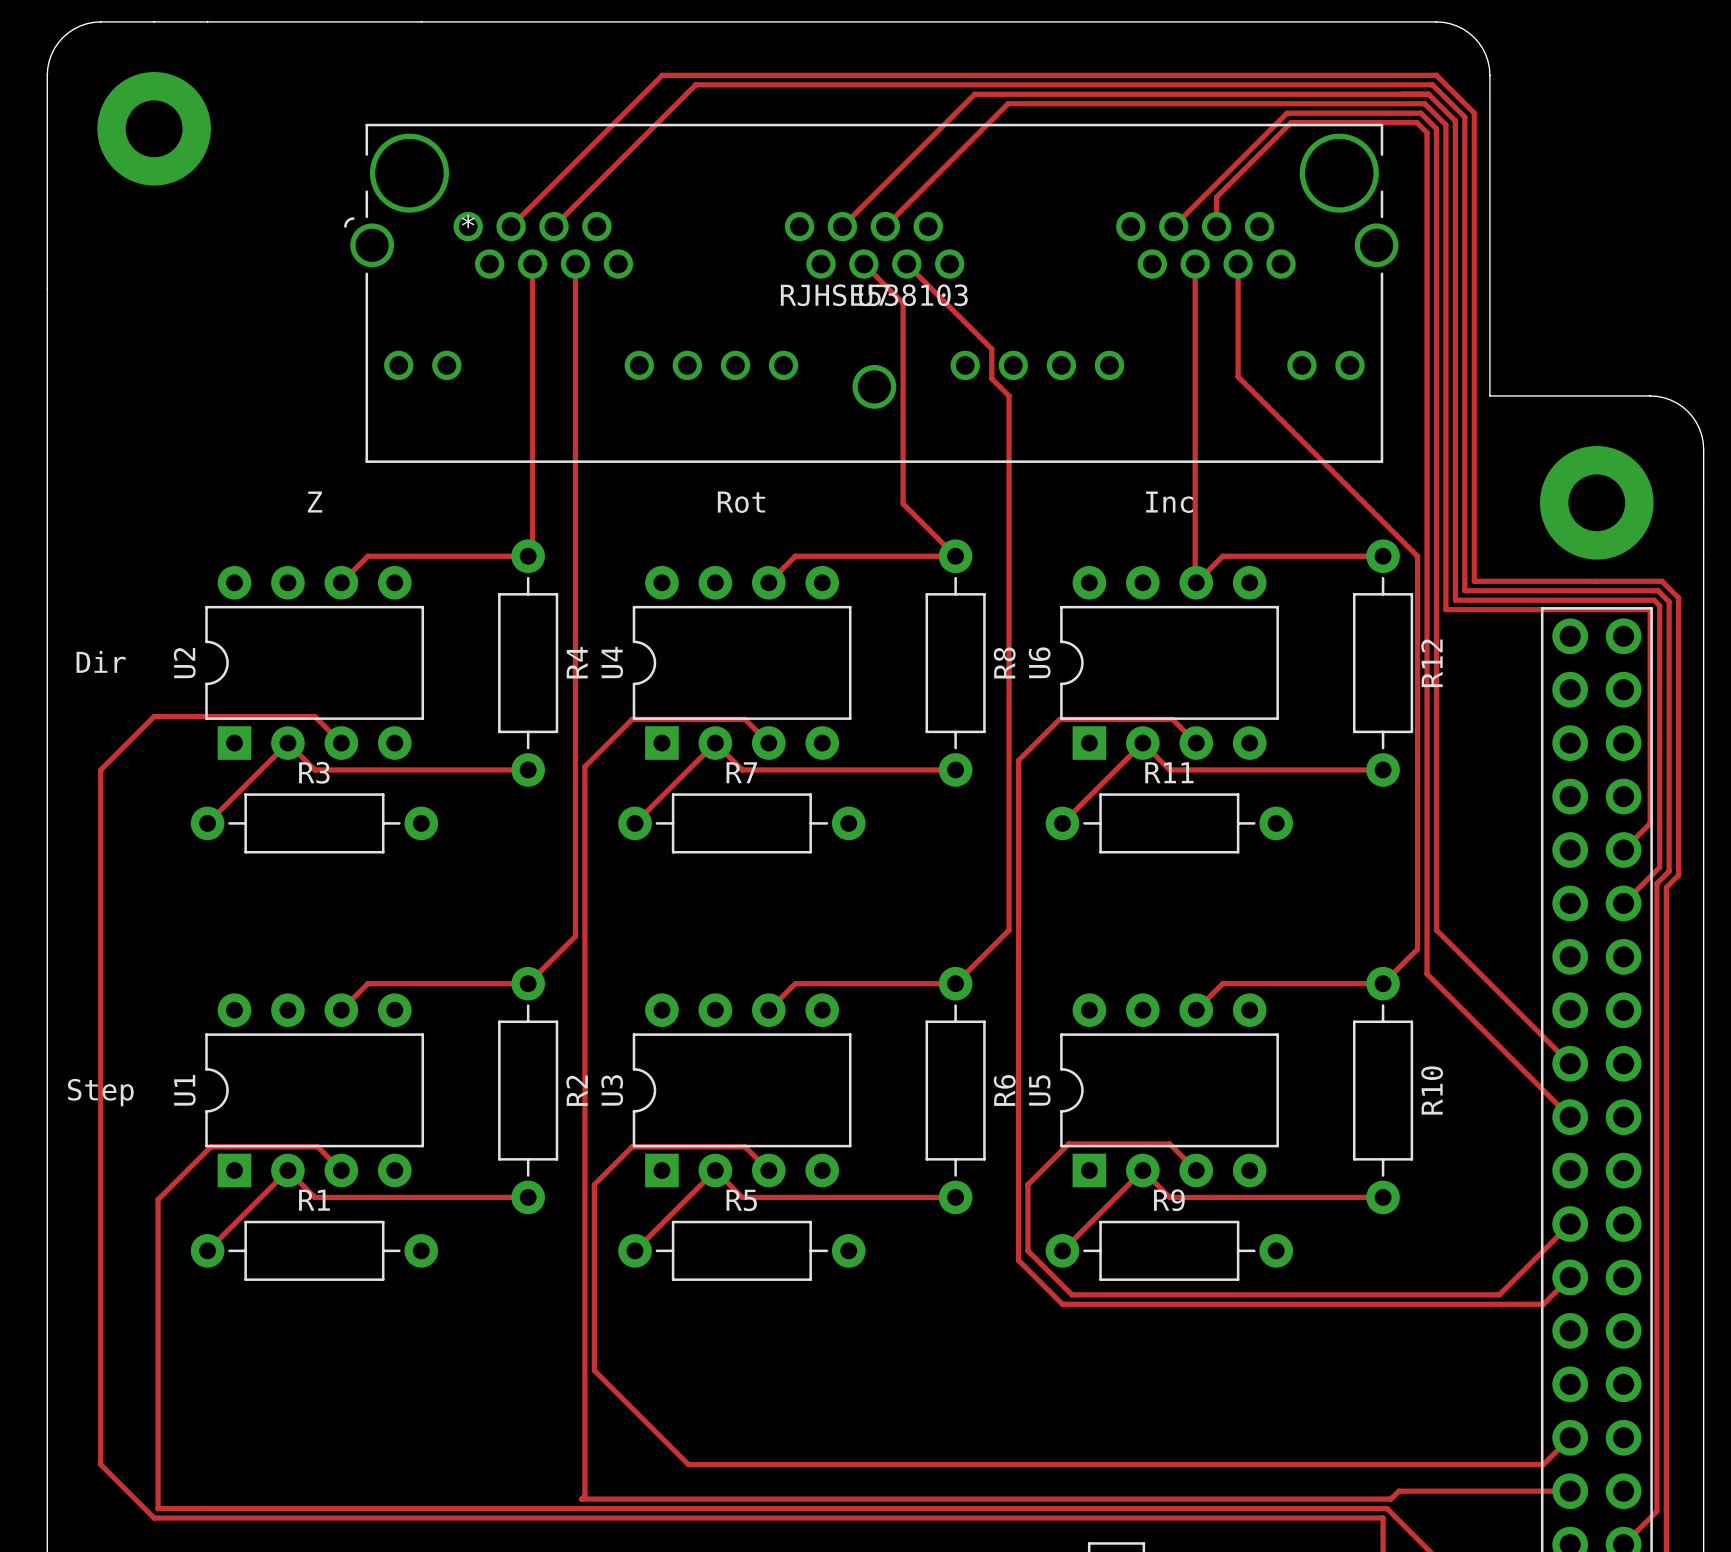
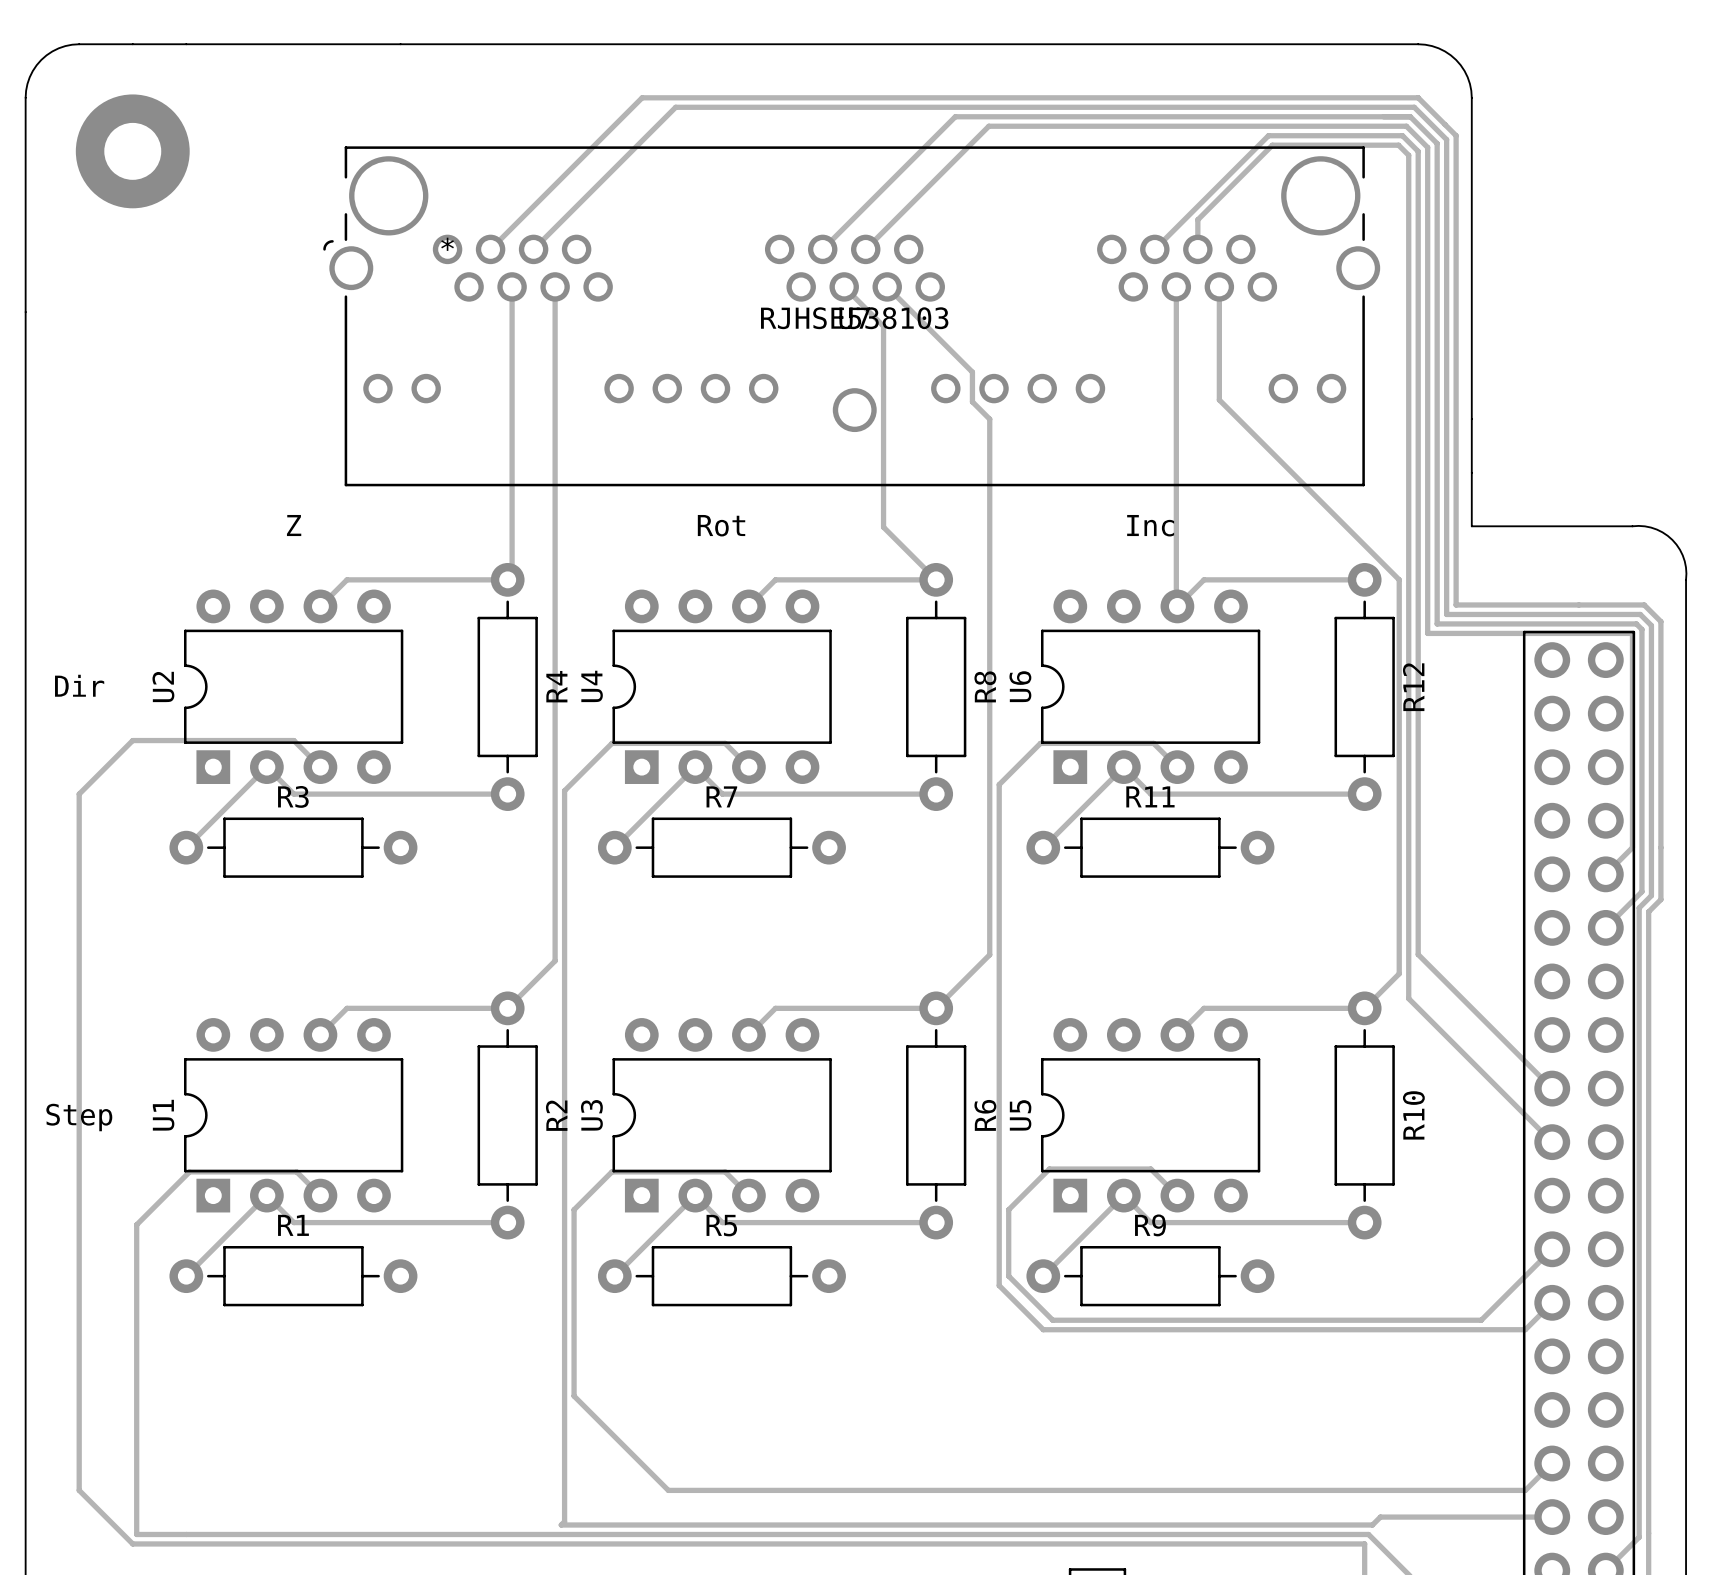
board edge: (1489, 395) (1650, 395) (1670, 400) (1682, 406) (1696, 422) (1703, 442) (1703, 556) -> (1471, 419) (1471, 526) (1638, 525) (1651, 527) (1662, 532) (1676, 544) (1684, 561) (1686, 579)
part: (1596, 502) -> none

